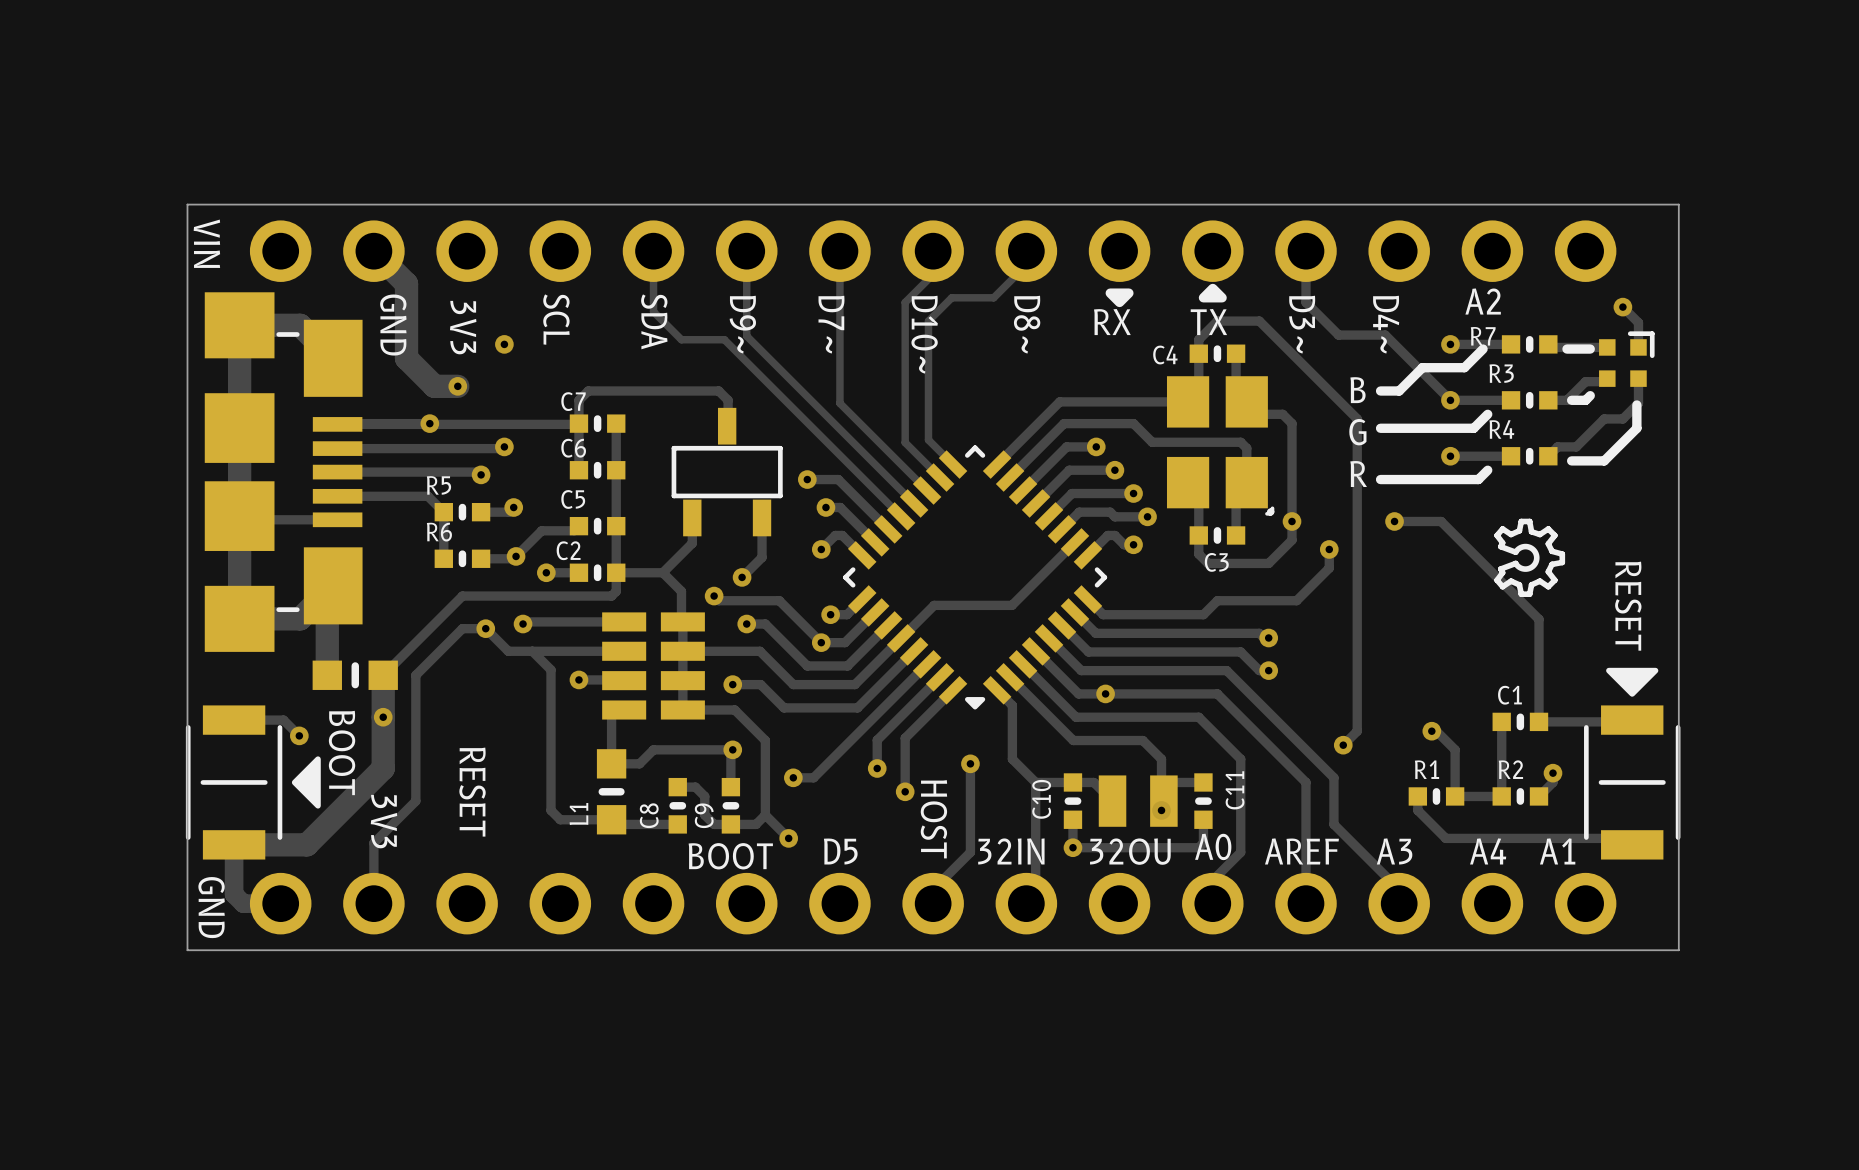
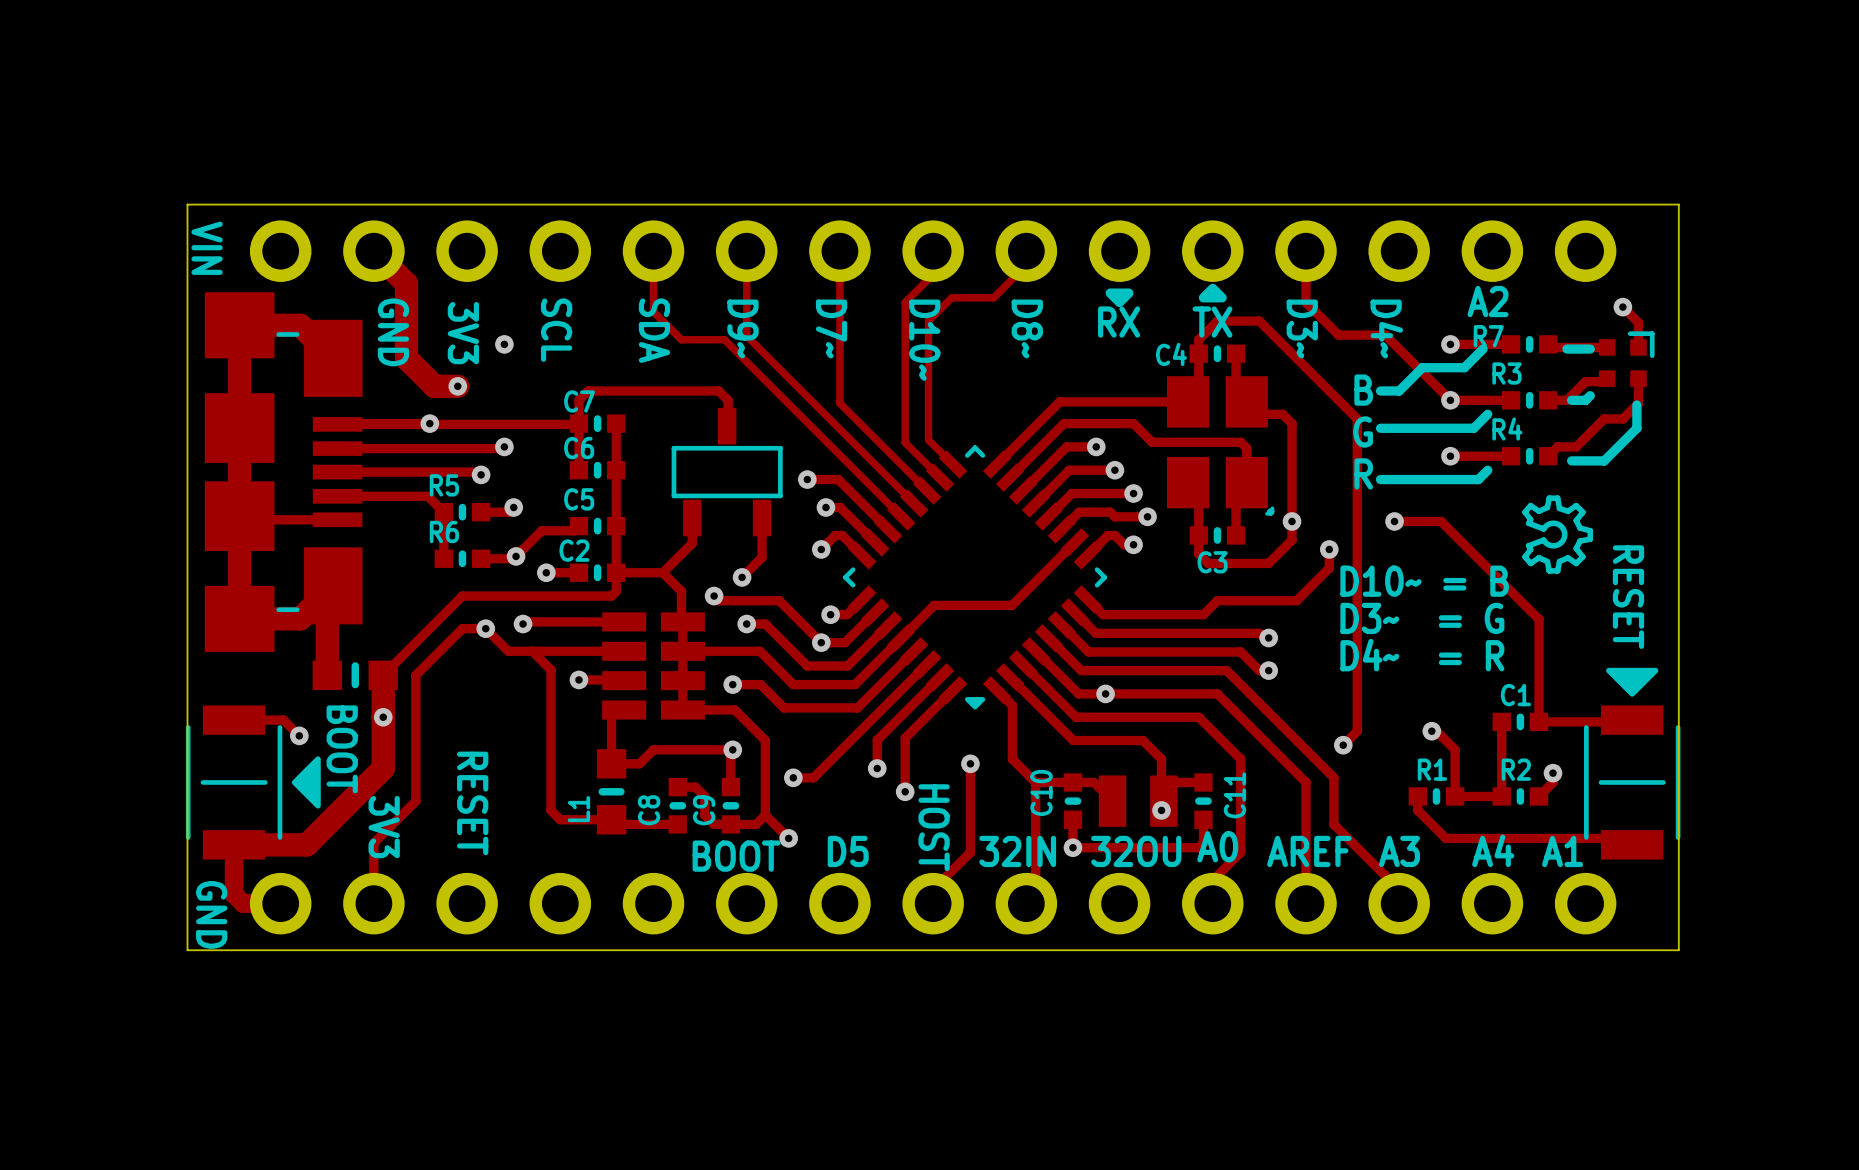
drawing position: (1529, 557) -> (1557, 534)
text: none -> D10~ = B (1424, 581)
text: none -> D3~ = G (1422, 618)
text: none -> D4~ = R (1422, 655)

